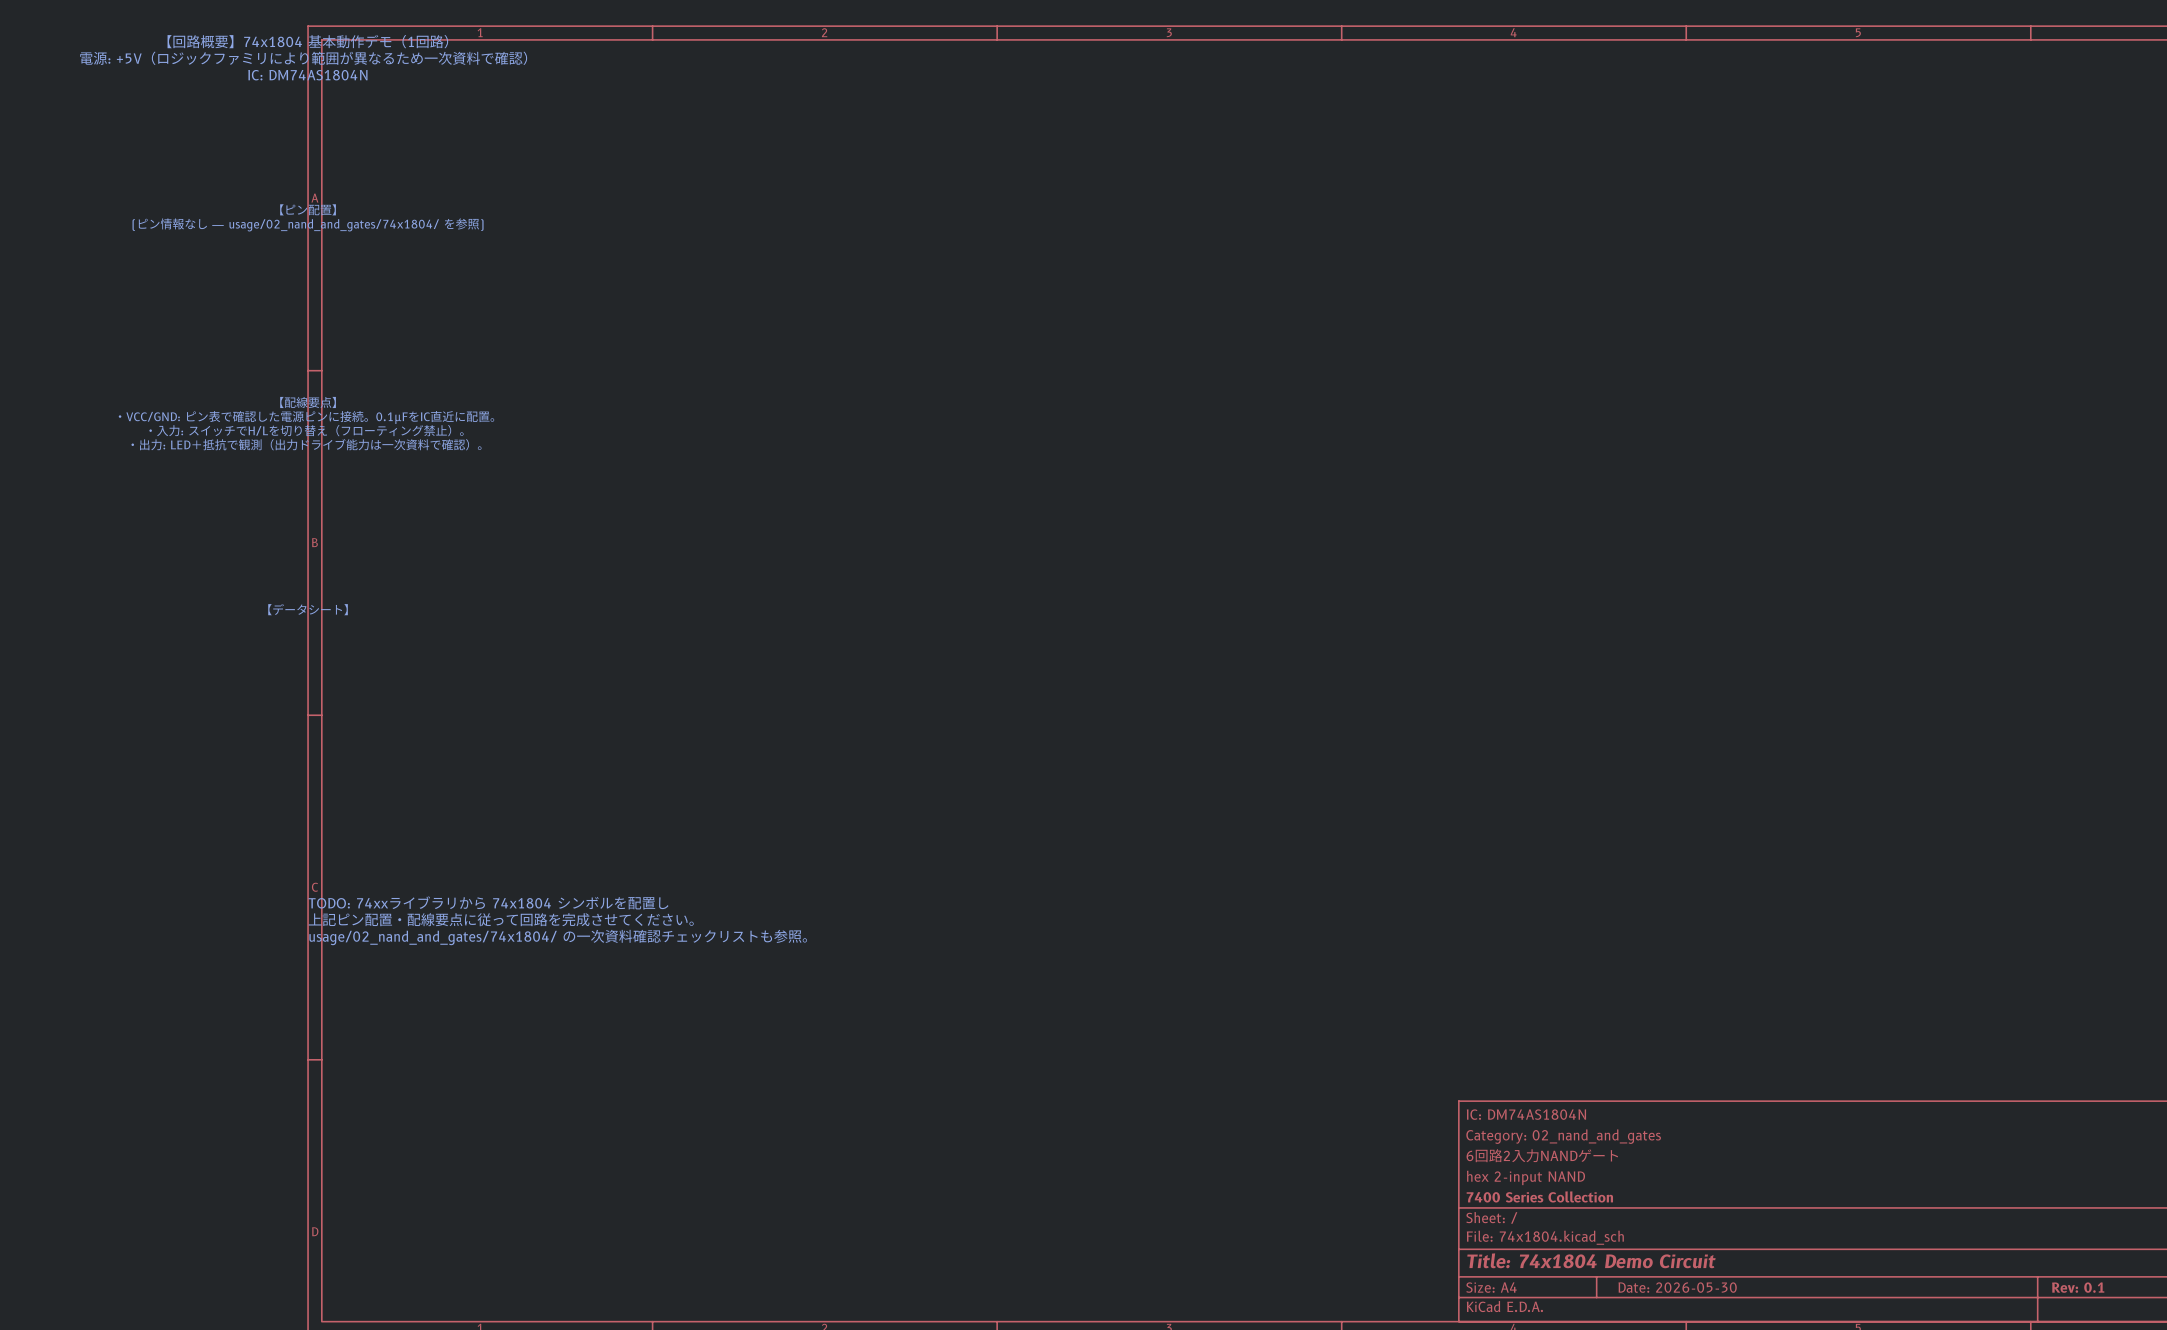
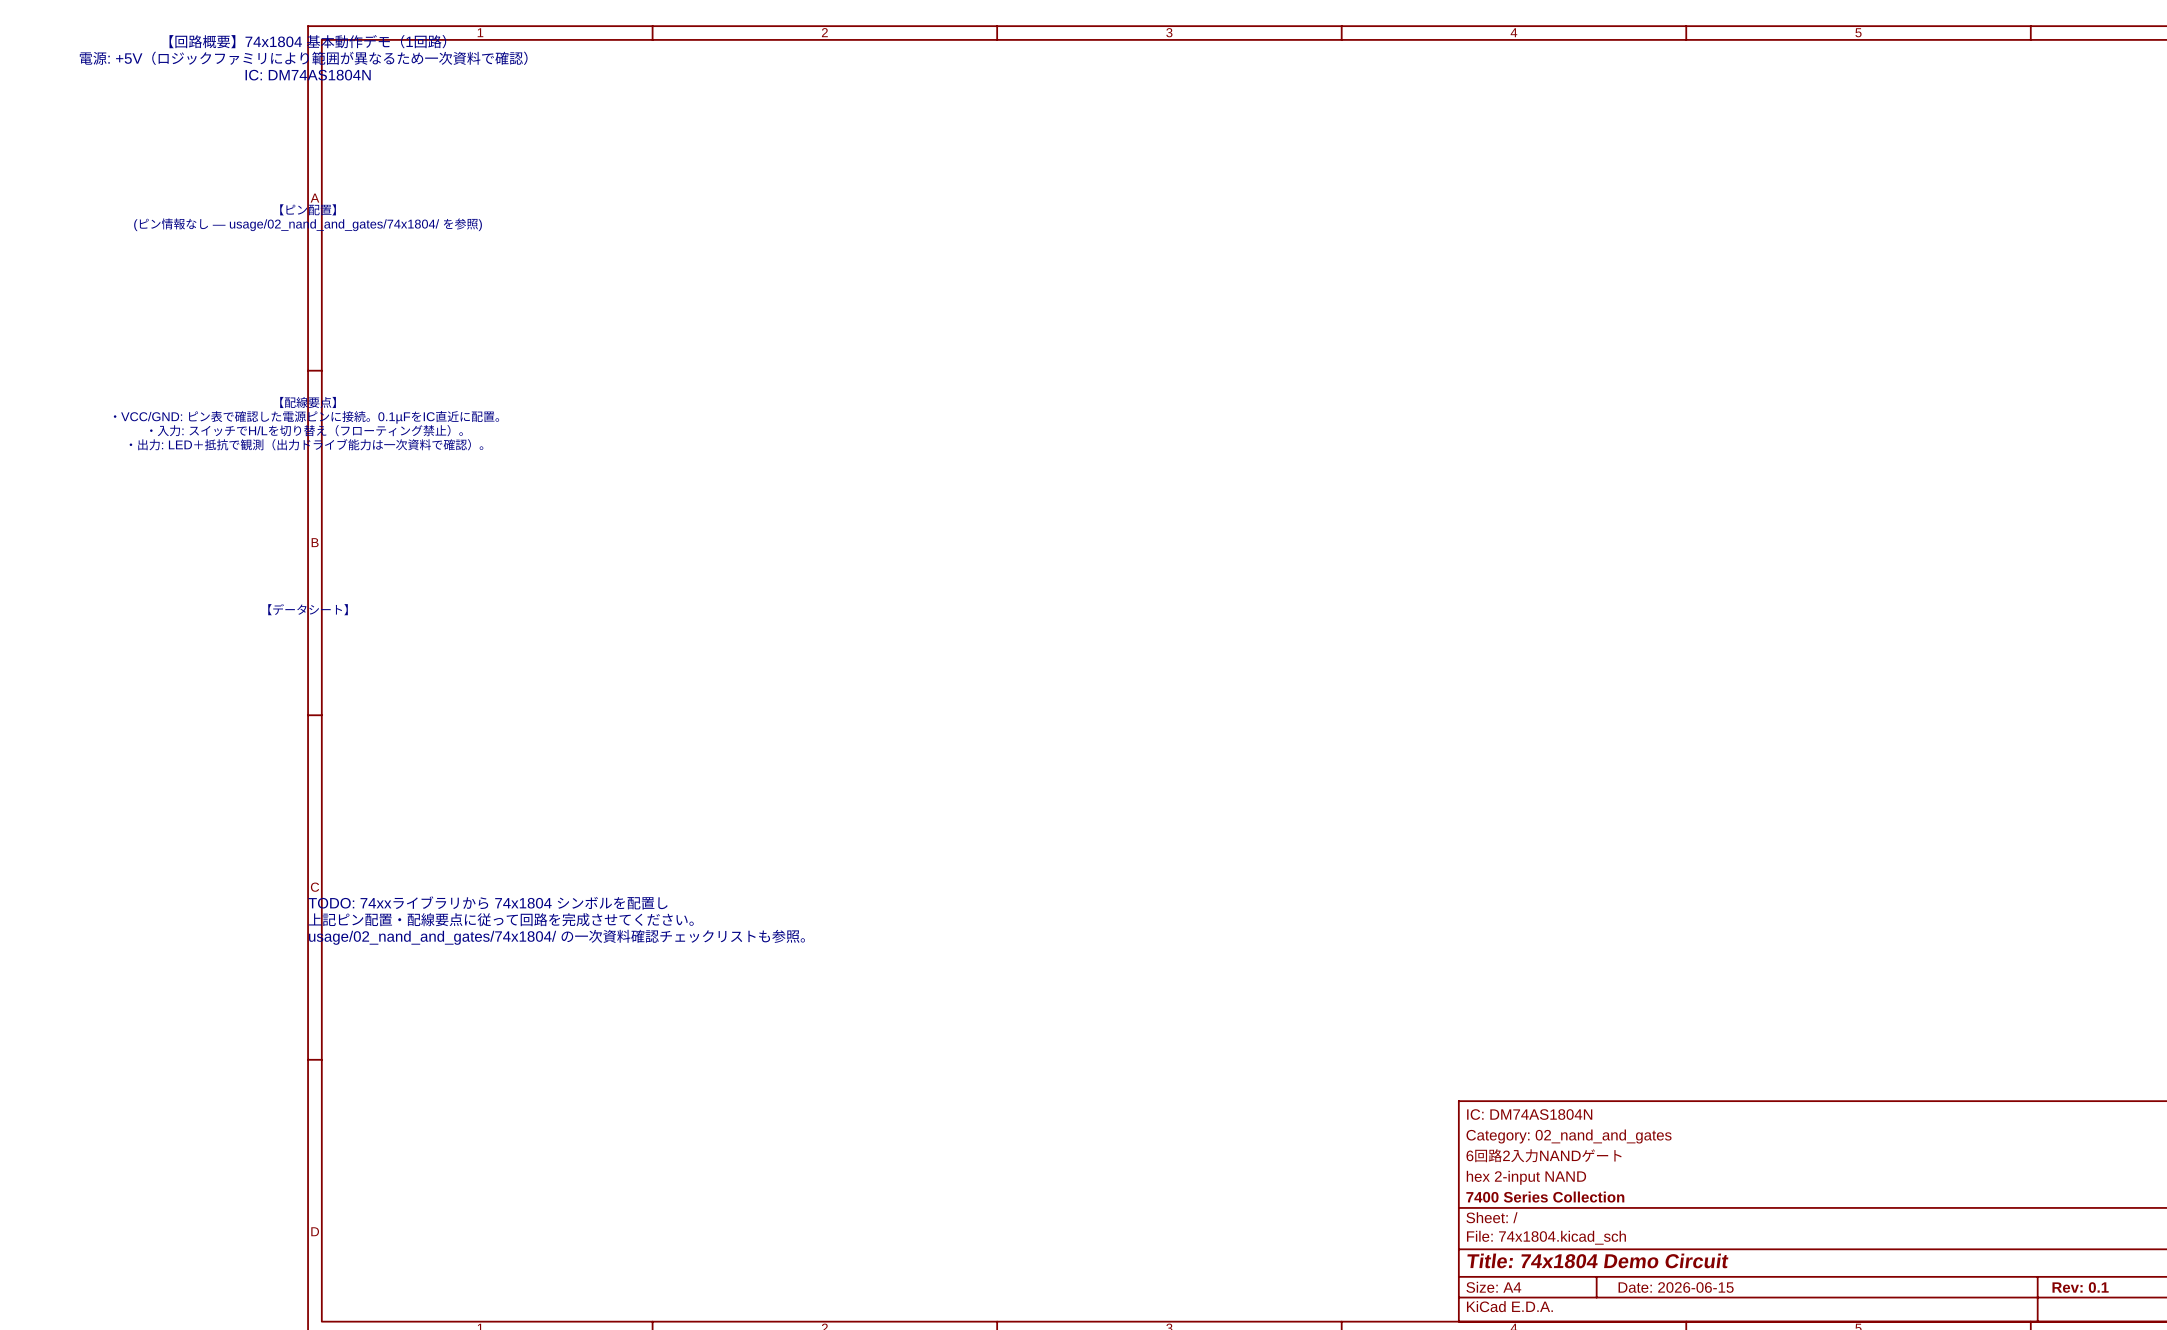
title block: Date: 2026-05-30 (1677, 1287) -> Date: 2026-06-15 (1676, 1287)

